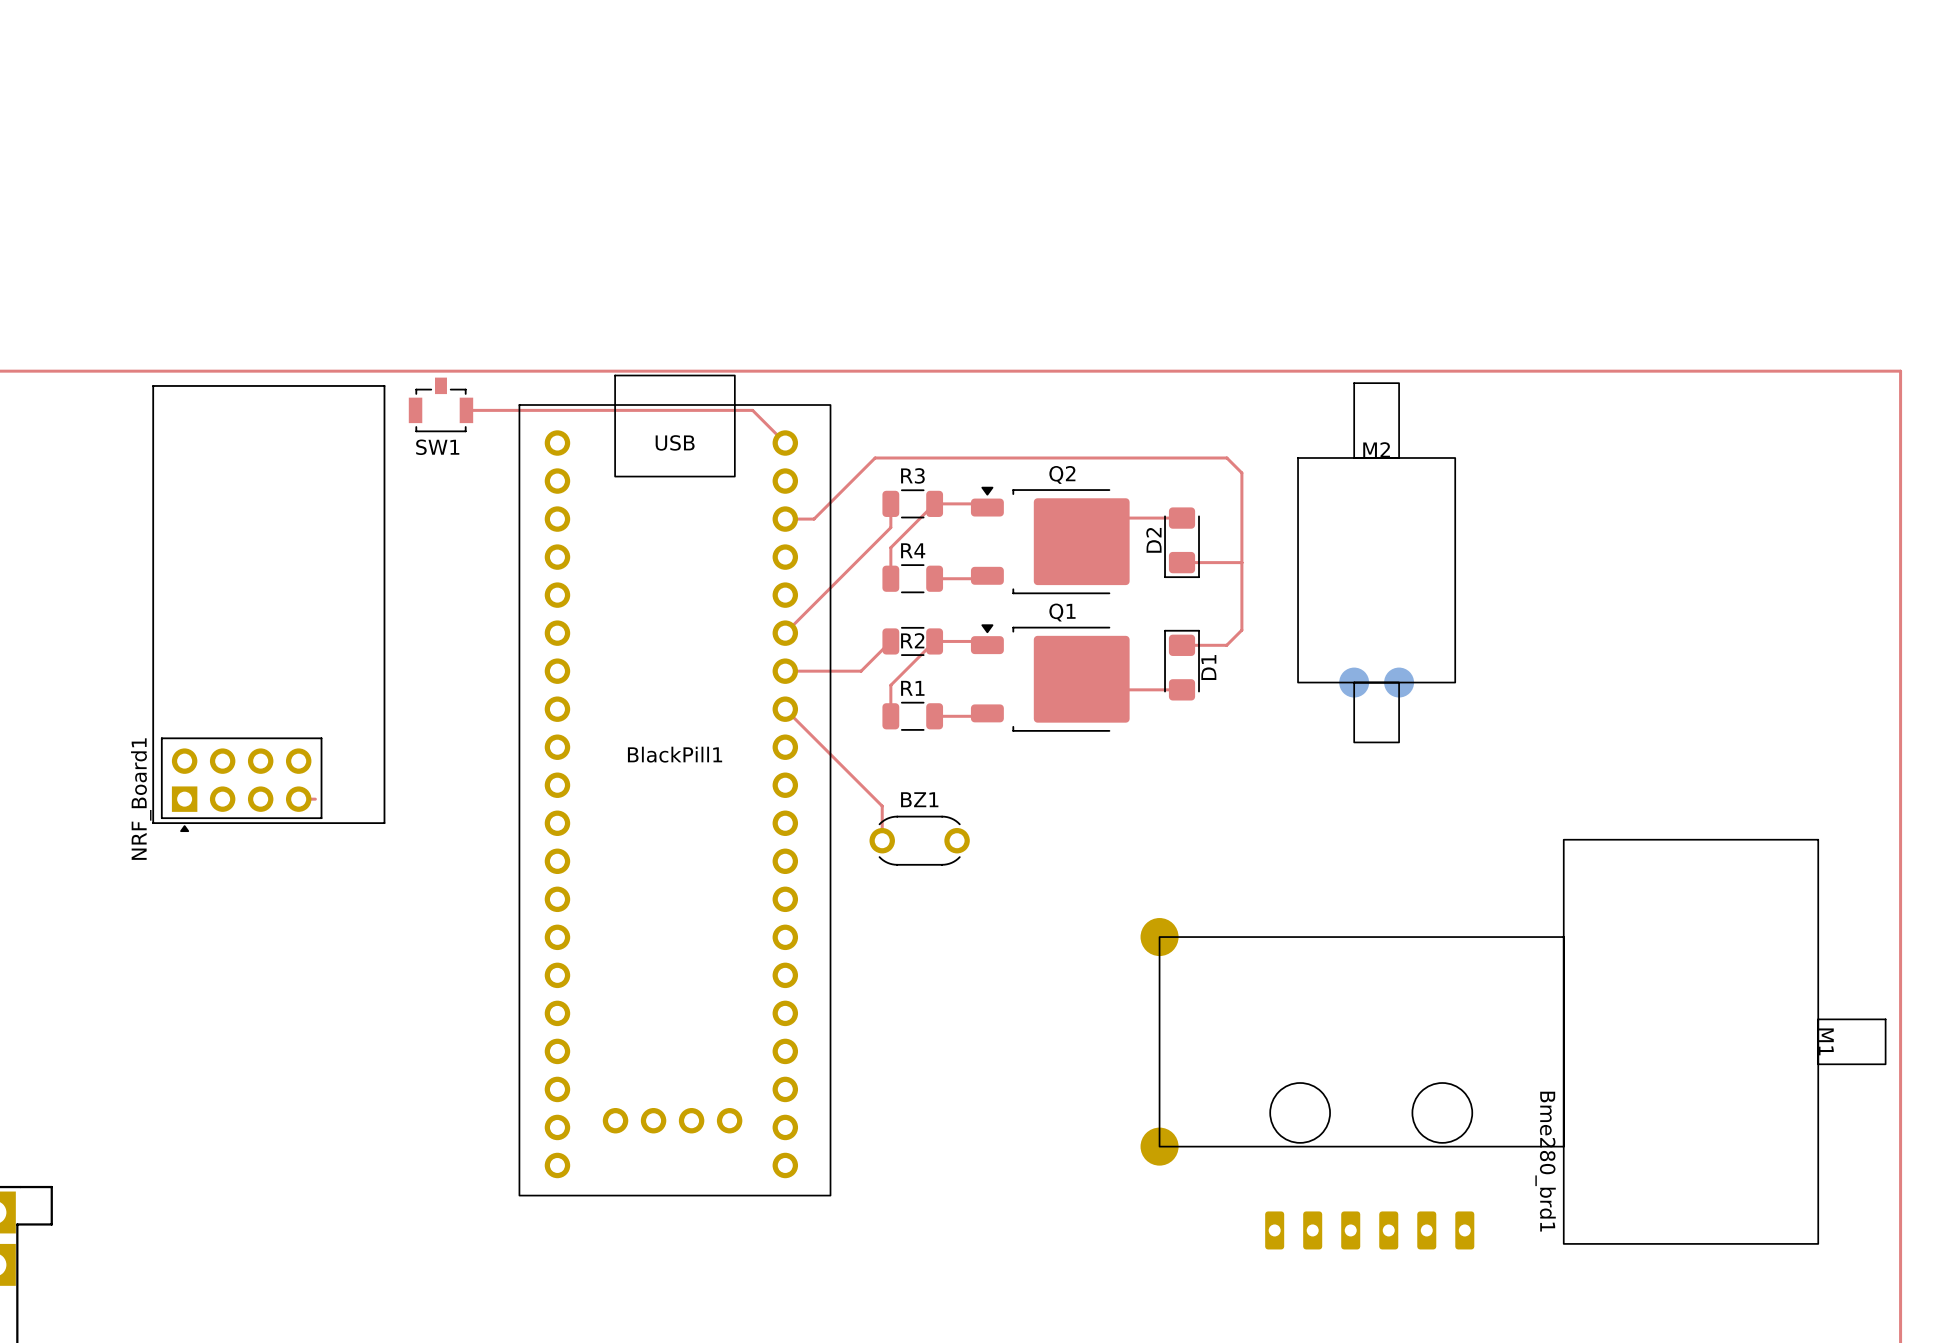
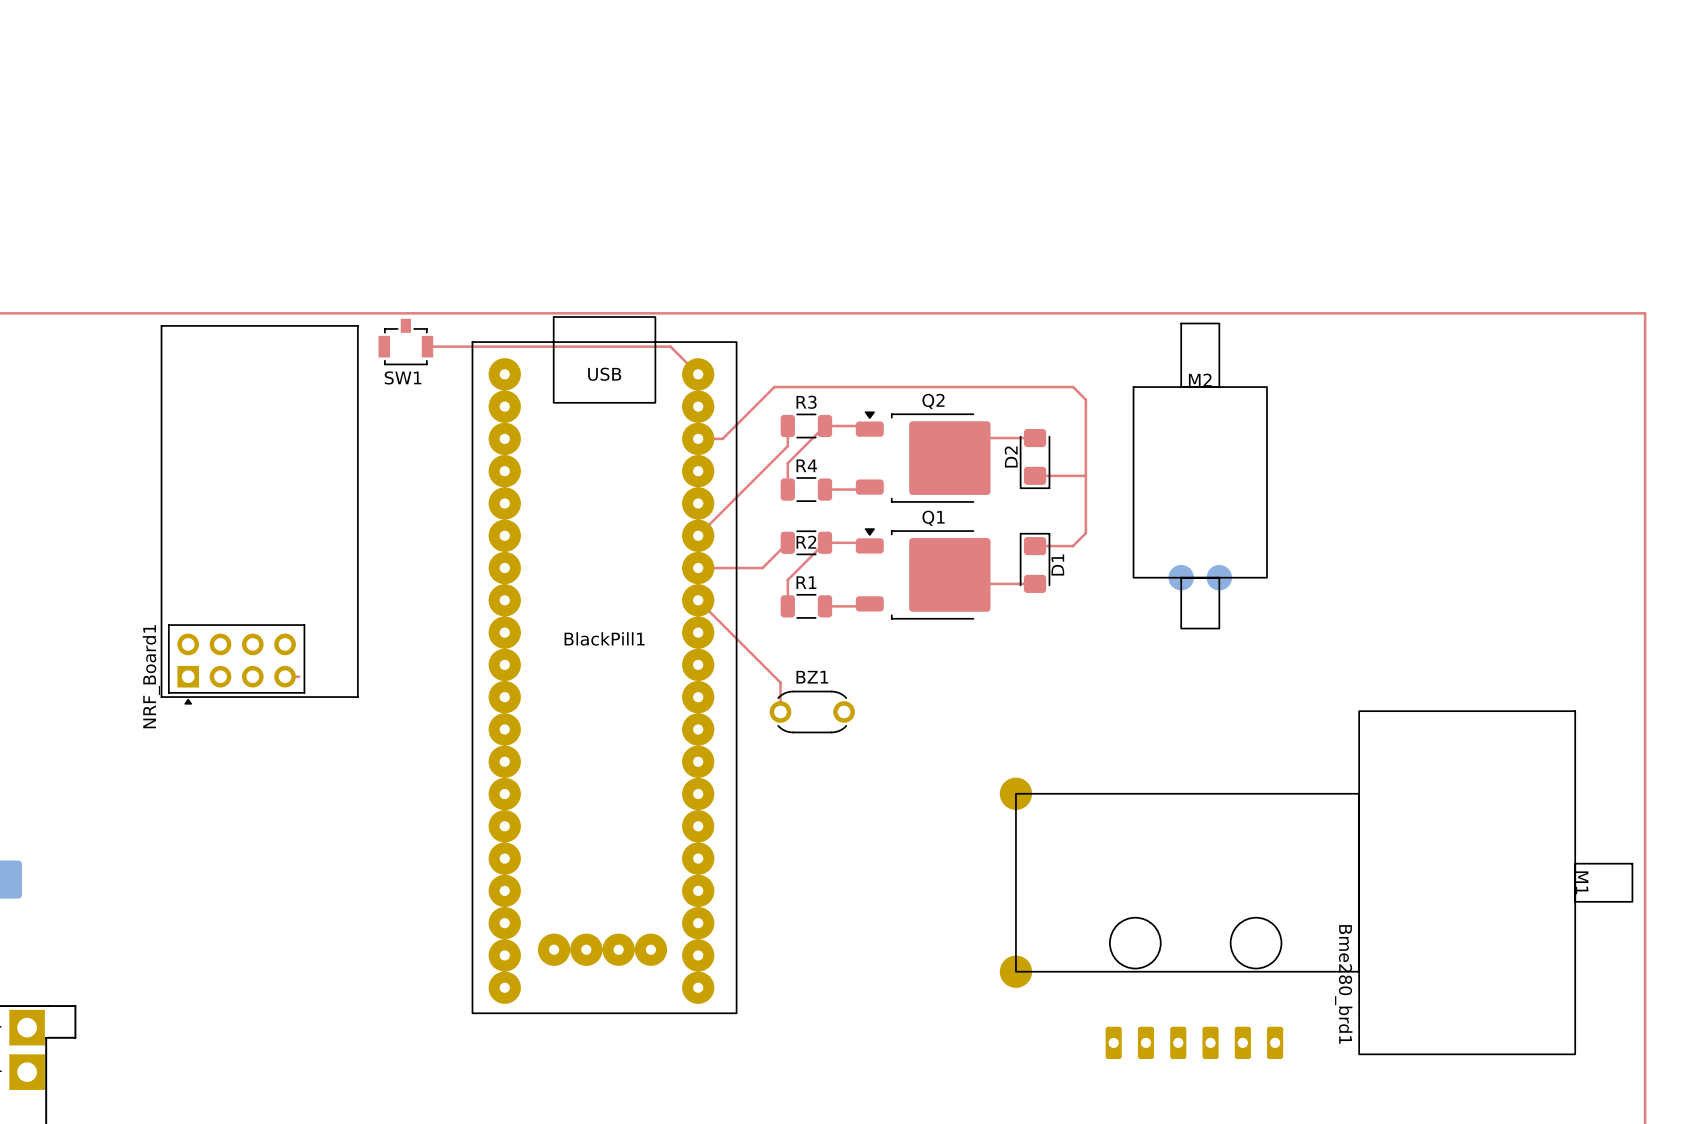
BlackPill1 footprint: [518, 374, 832, 1197] -> [471, 316, 738, 1014]

